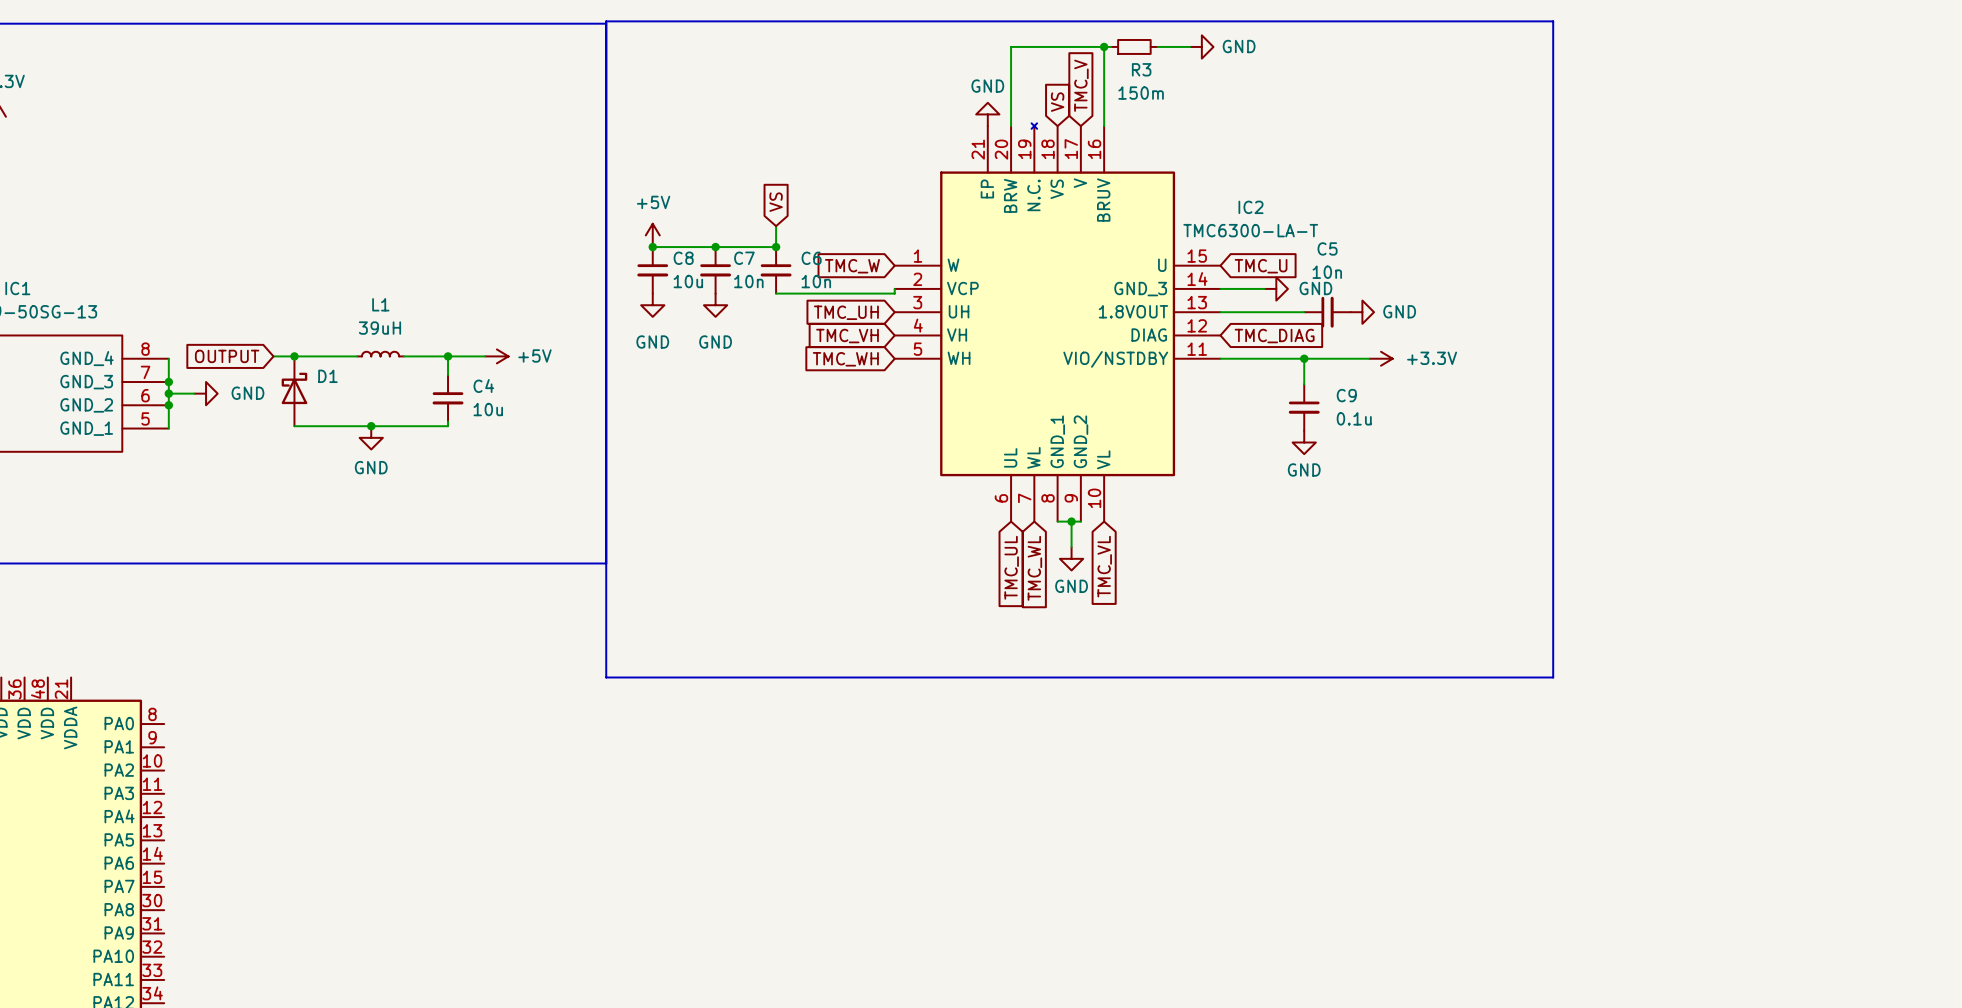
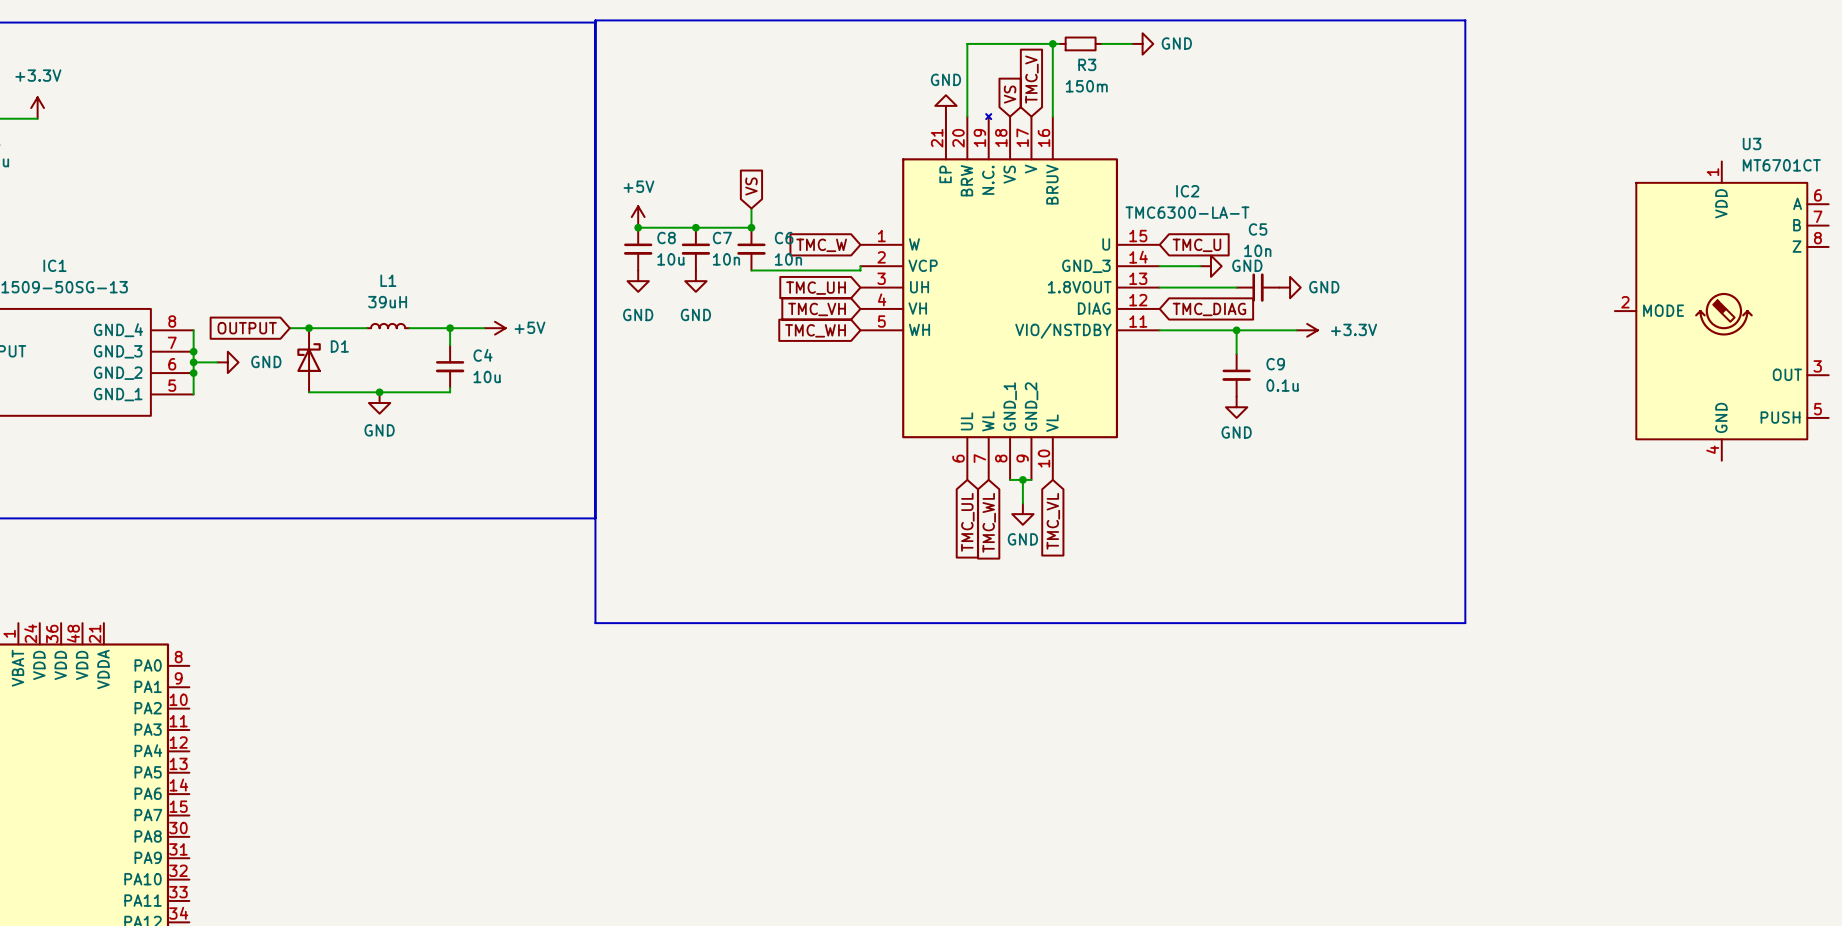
U3: none -> MT6701CT (1721, 311)

